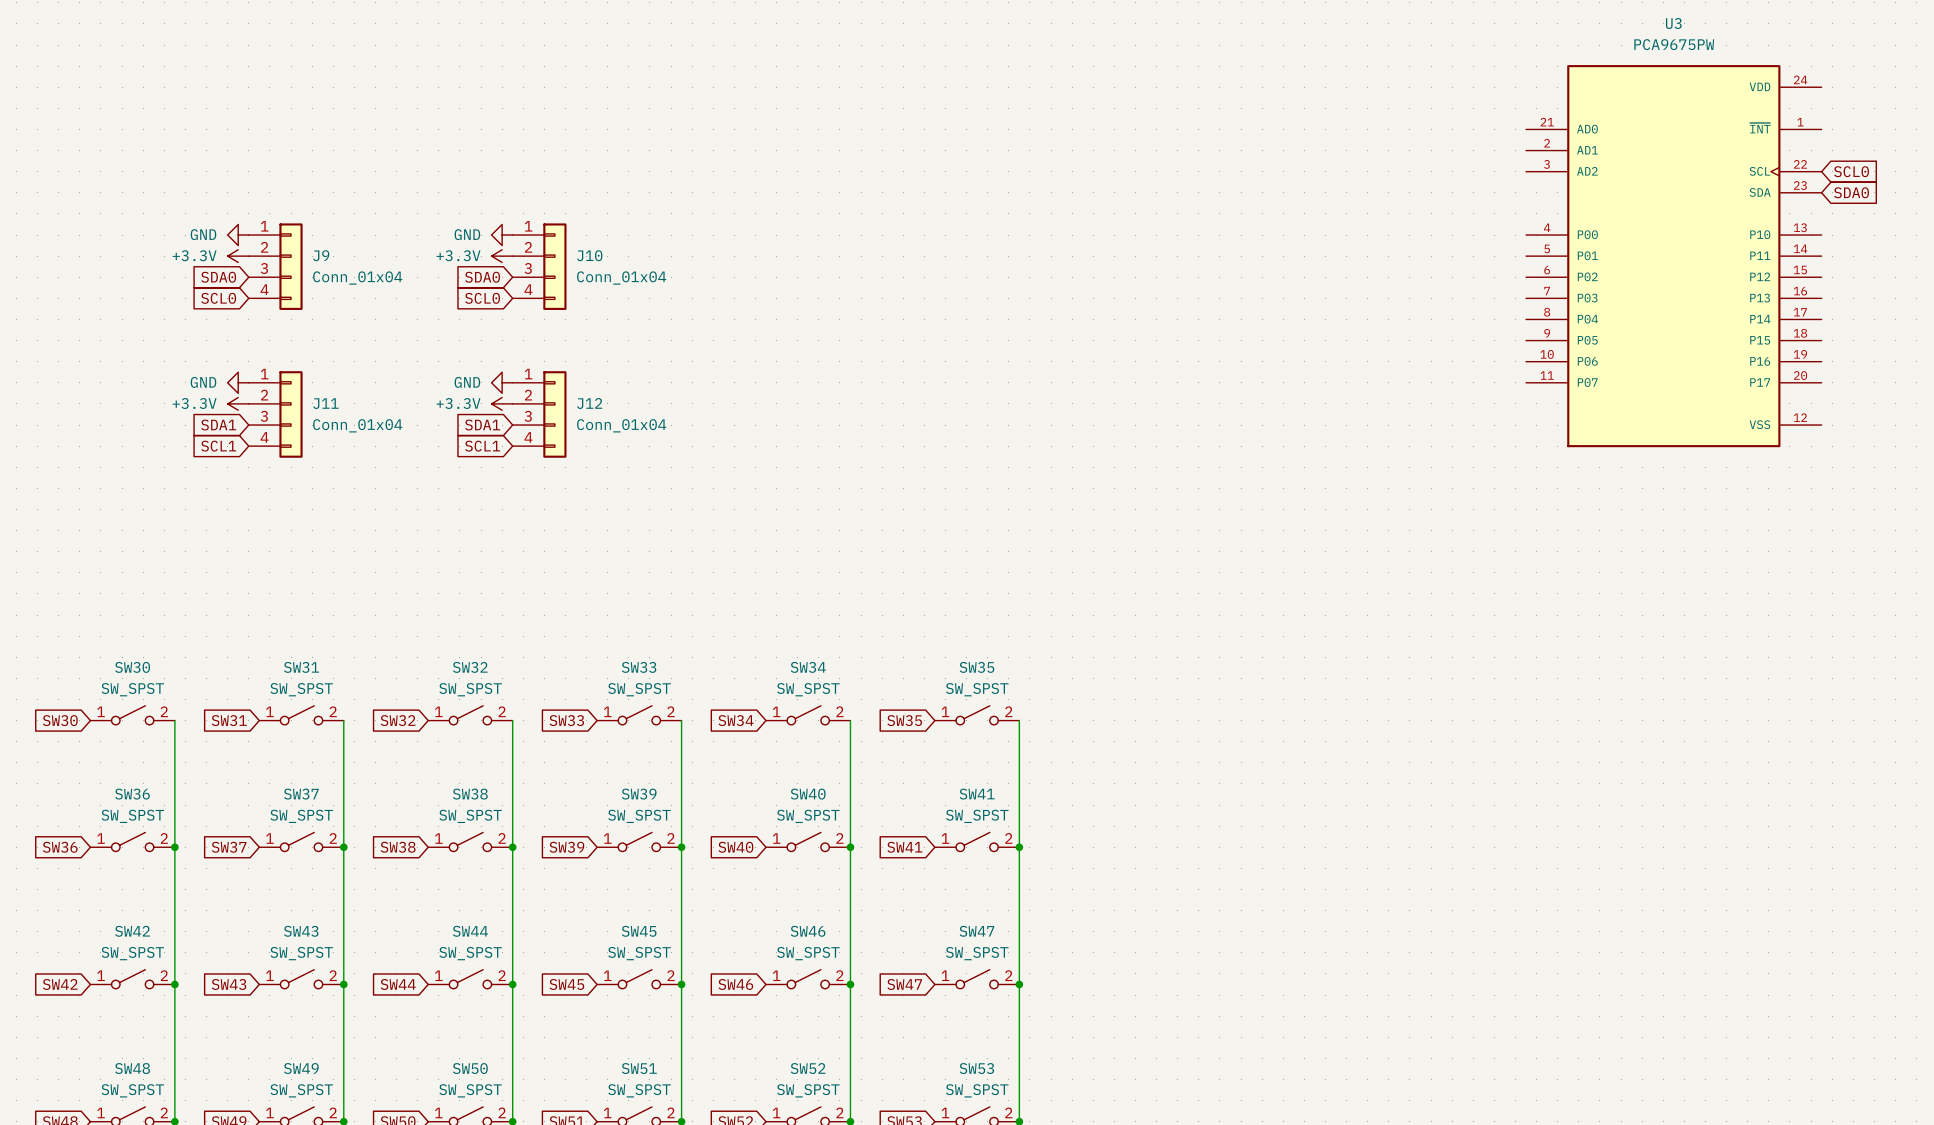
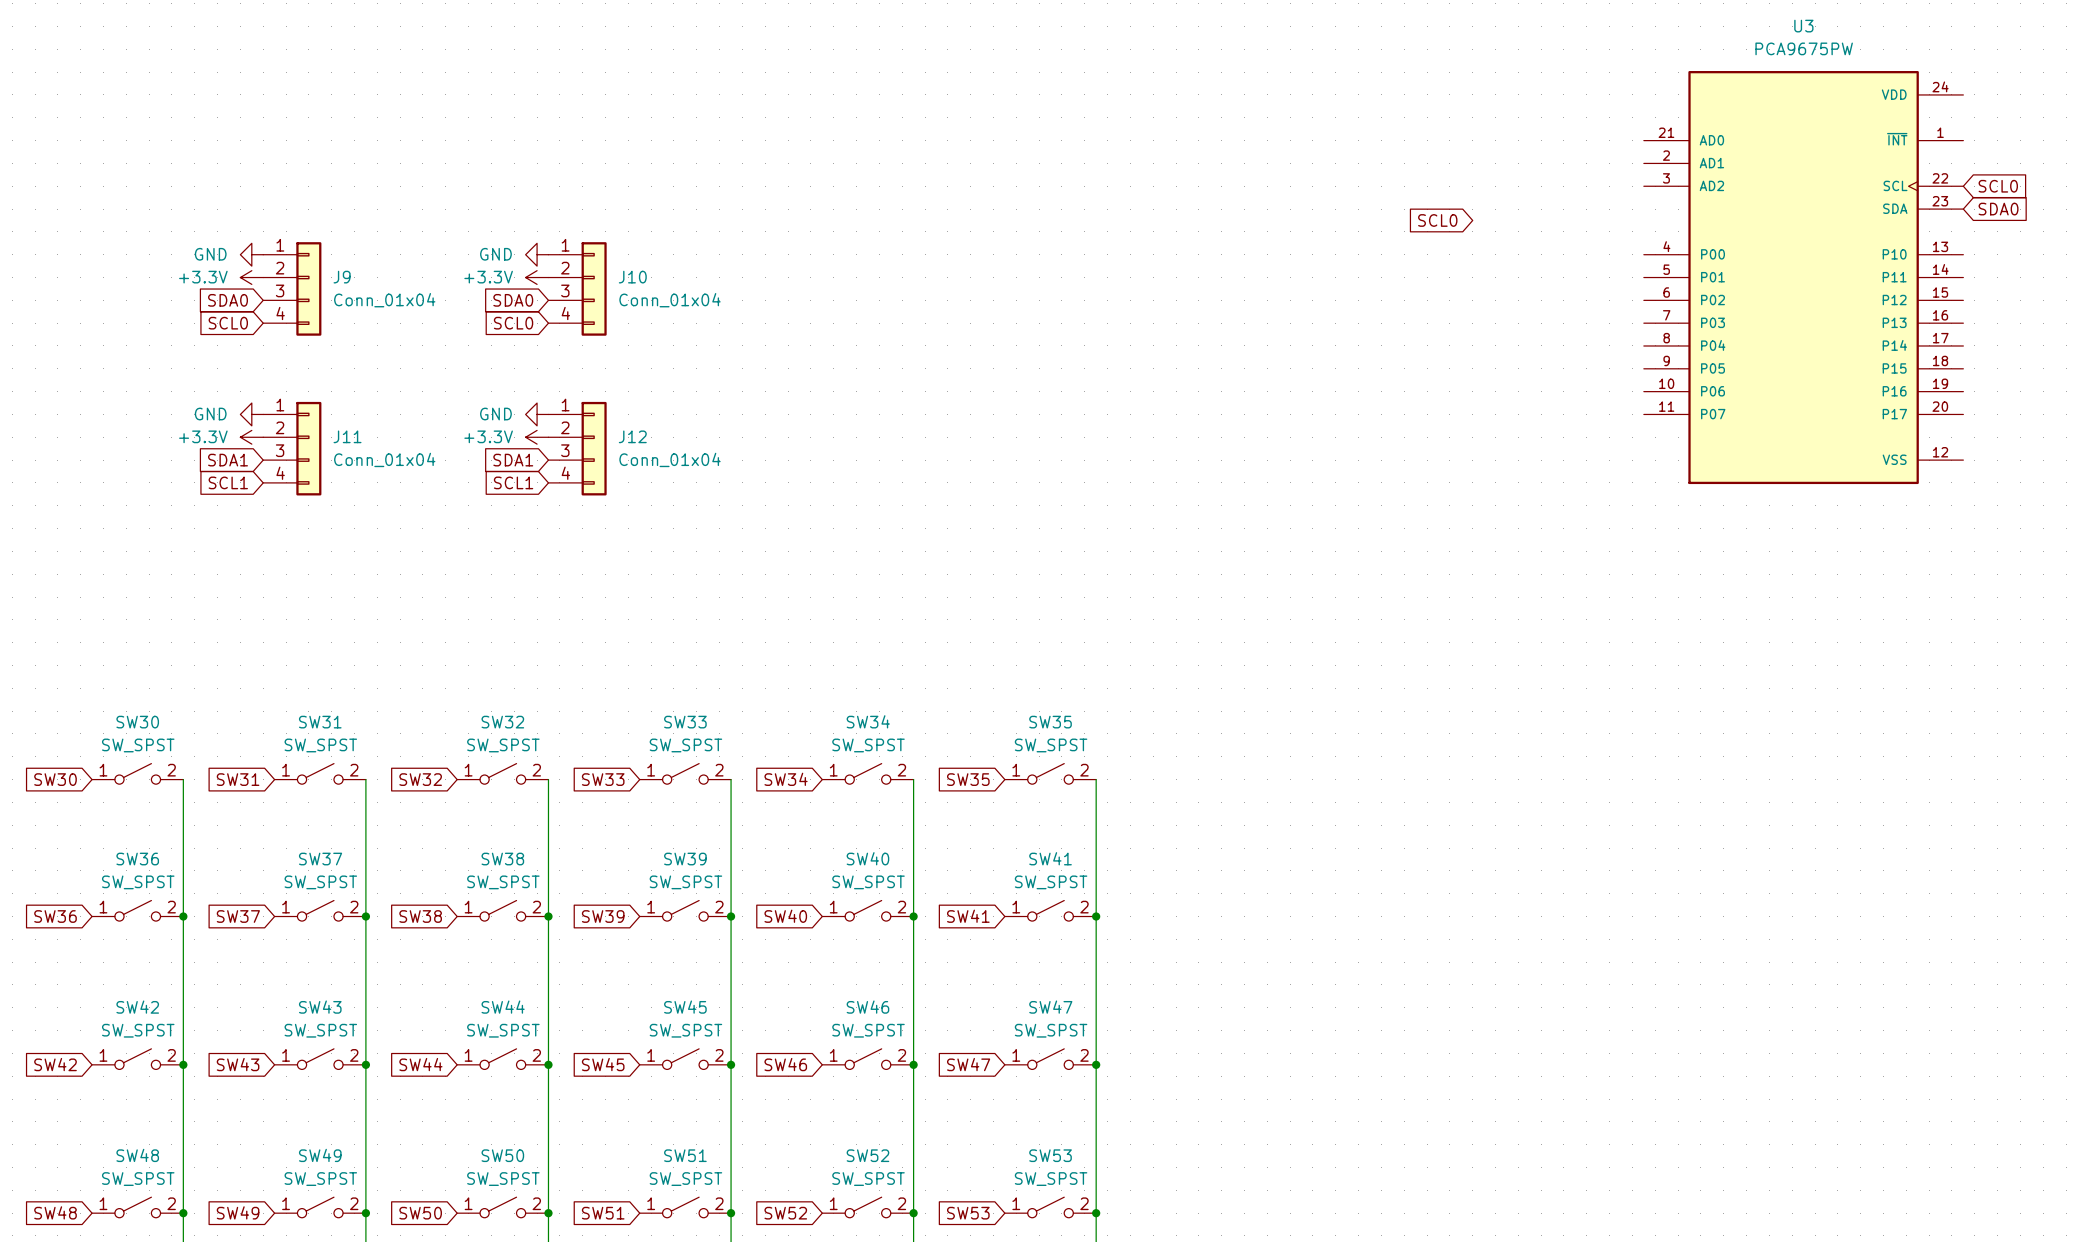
global label: none -> SCL0 (1437, 220)

